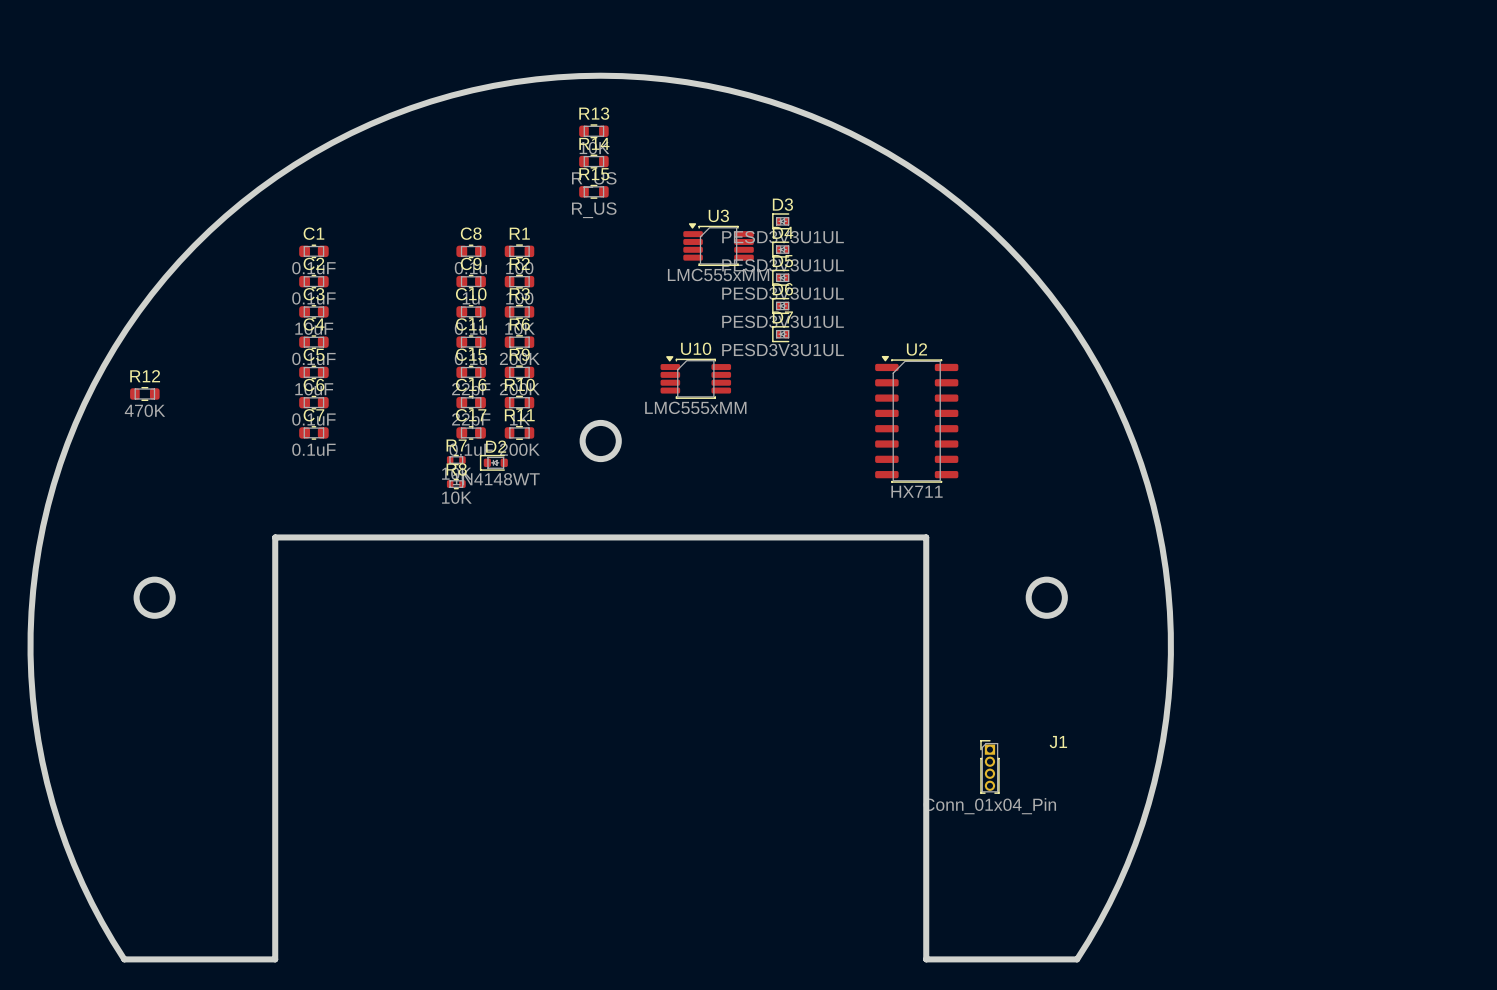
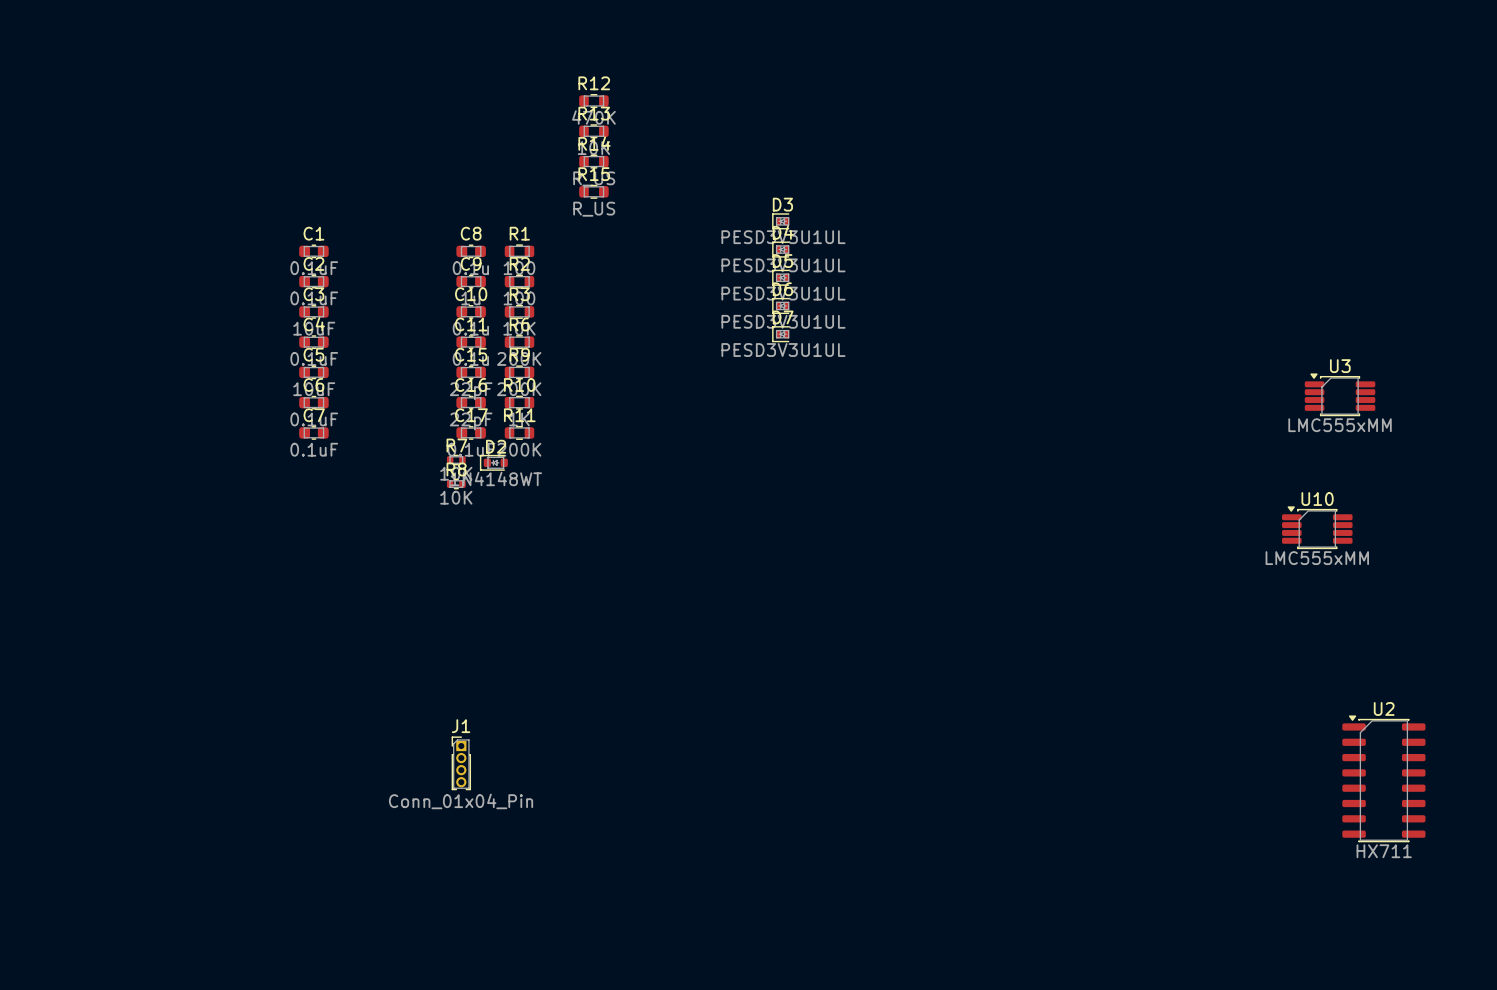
U3 position: (718, 244) -> (1340, 394)
U10 position: (695, 377) -> (1317, 527)
R12 position: (144, 393) -> (593, 101)
round board edge: [579, 419, 622, 463] -> none
U2 position: (916, 419) -> (1383, 778)
board edge: (275, 537) (275, 959) (124, 959) (102, 922) (82, 884) (66, 844) (52, 803) (42, 761) (35, 719) (31, 676) (30, 633) (35, 568) (43, 526) (53, 484) (67, 443) (84, 404) (103, 365) (126, 329) (151, 294) (179, 261) (209, 230) (242, 202) (276, 176) (313, 153) (351, 133) (390, 115) (431, 101) (472, 90) (514, 82) (557, 77) (600, 75) (643, 77) (686, 82) (728, 90) (770, 101) (811, 115) (869, 143) (924, 176) (959, 202) (1007, 245) (1049, 294) (1086, 347) (1107, 384) (1125, 423) (1147, 484) (1158, 526) (1168, 590) (1170, 633) (1168, 697) (1159, 761) (1142, 824) (1127, 864) (1109, 903) (1077, 959) (926, 959) (926, 537) (275, 537) -> none
round board edge: [133, 576, 176, 619] -> none
round board edge: [1025, 576, 1068, 619] -> none
J1 name position: J1 (1058, 742) -> J1 (461, 726)
J1 position: (989, 766) -> (461, 763)

